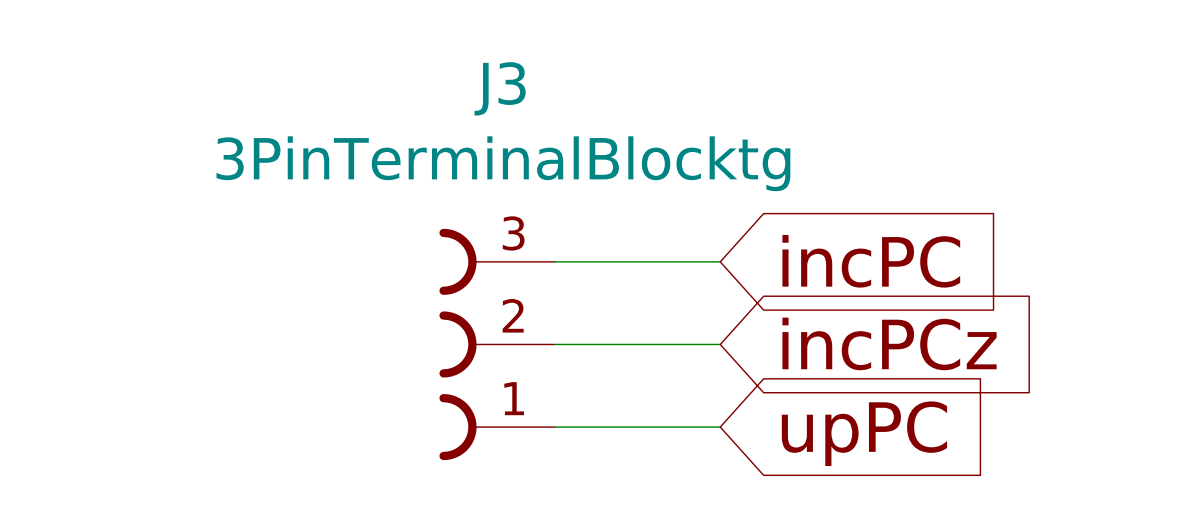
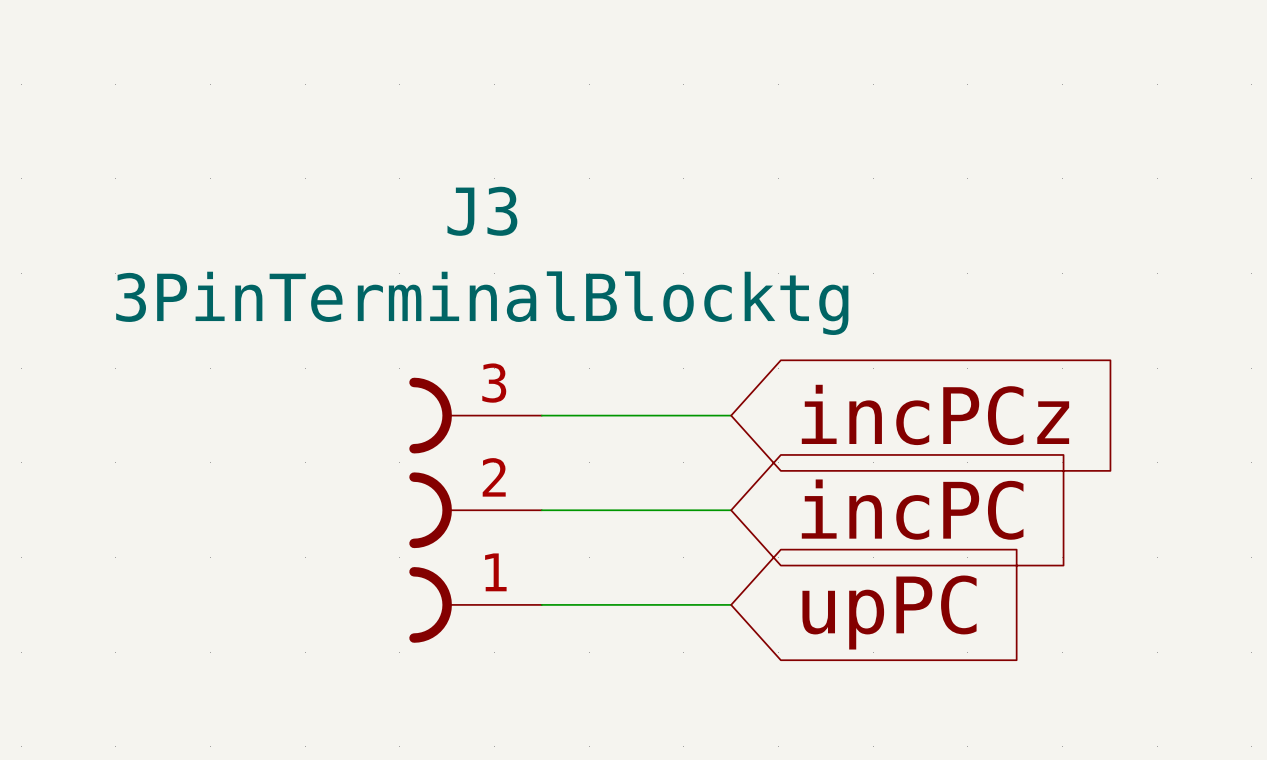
global label: incPC (871, 261) -> incPCz (935, 414)
global label: incPCz (889, 343) -> incPC (912, 509)

